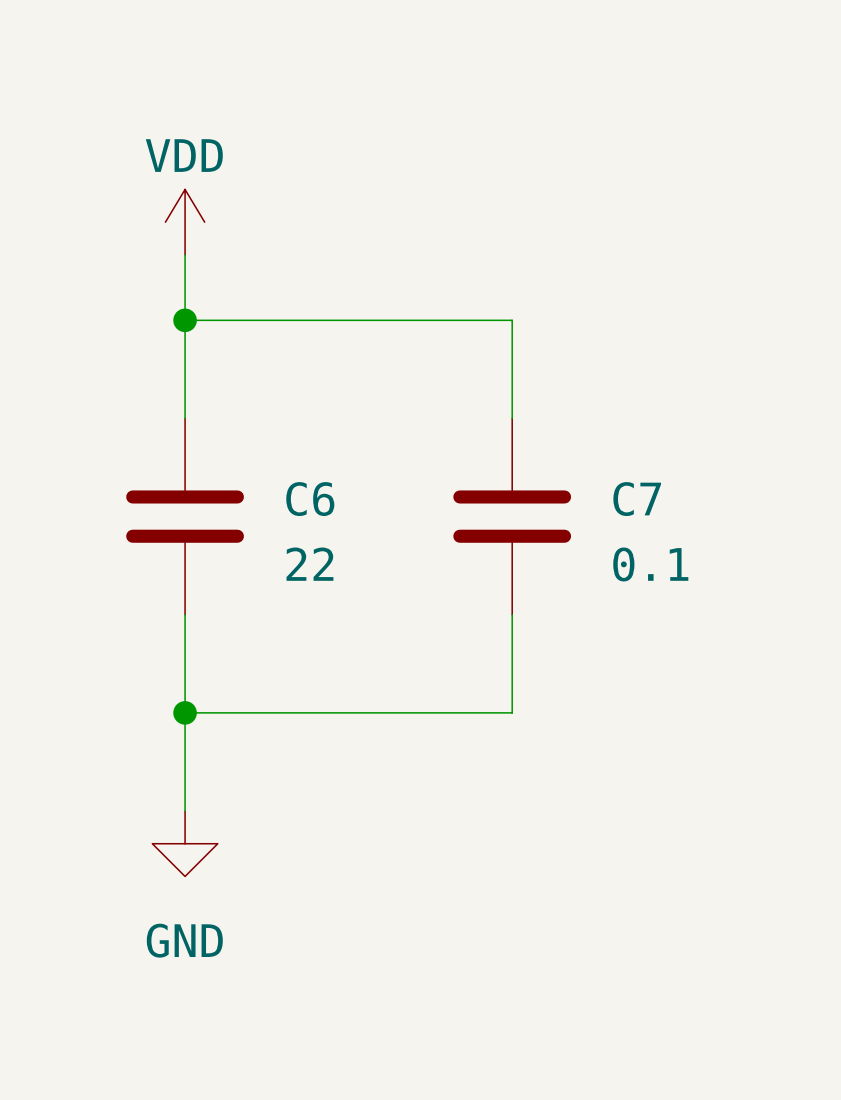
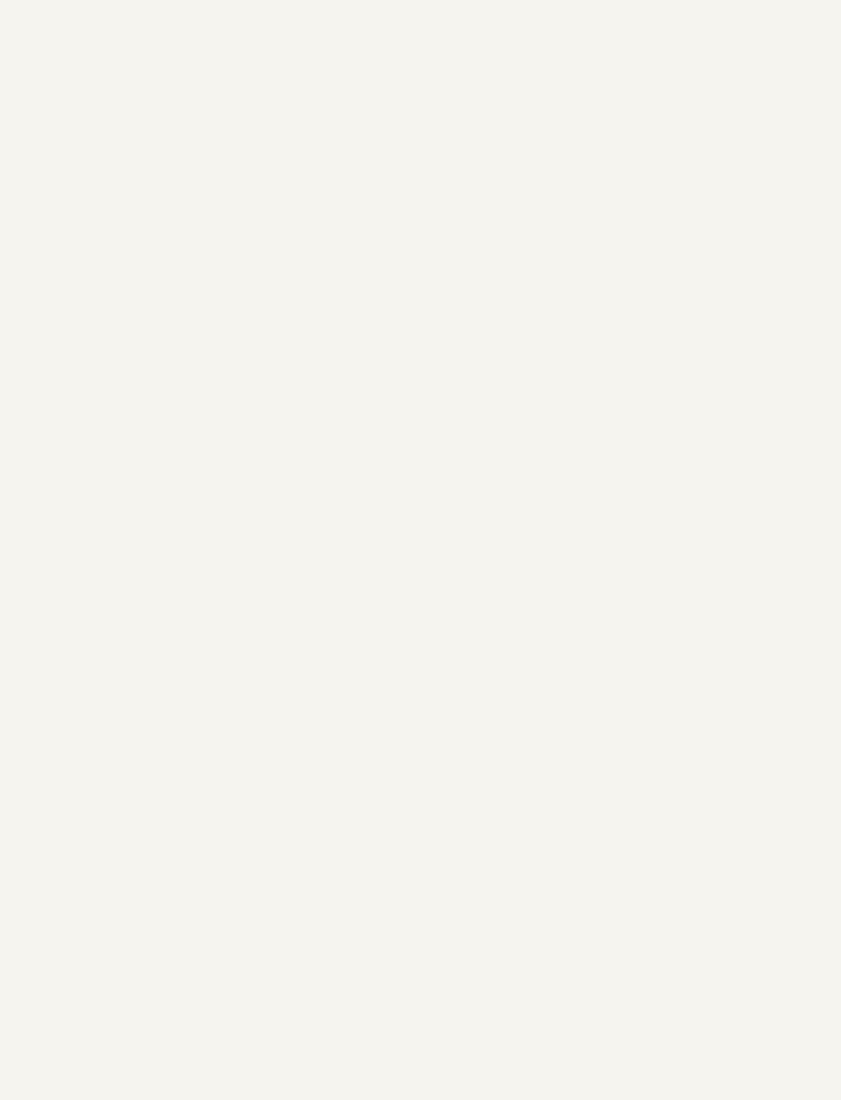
power symbol: VDD (185, 222) -> none
wire: (185, 254) (185, 418) -> none
wire: (185, 320) (512, 320) (512, 418) -> none
junction: (185, 320) -> none
C6: 22 (185, 516) -> none
C7: 0.1 (512, 516) -> none
wire: (185, 614) (185, 811) -> none
wire: (512, 614) (512, 712) (185, 712) -> none
junction: (185, 712) -> none
power symbol: GND (185, 843) -> none

